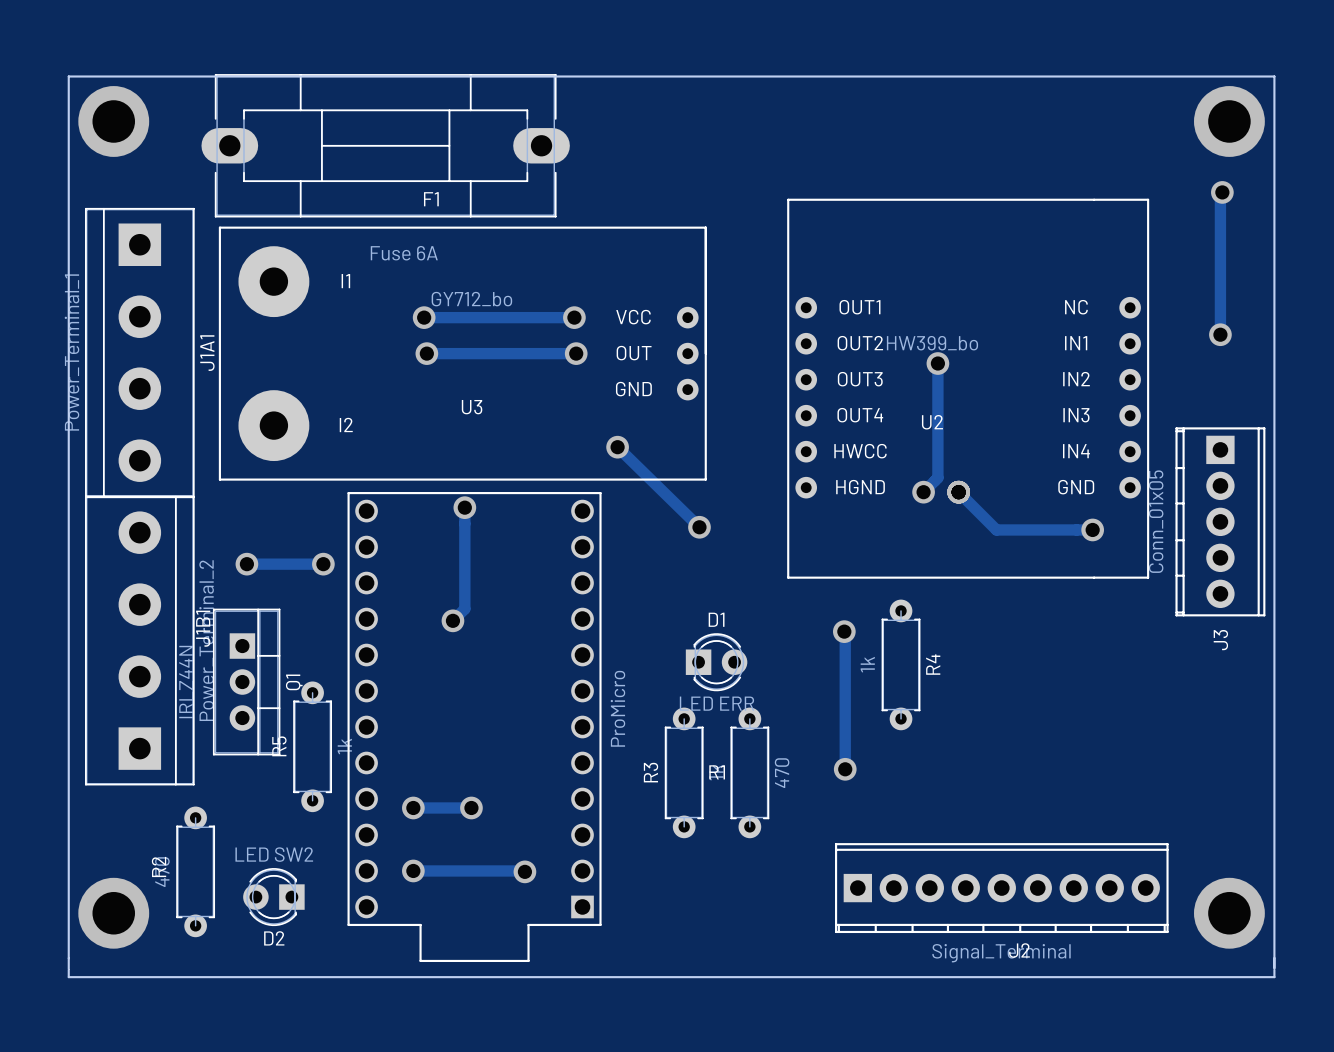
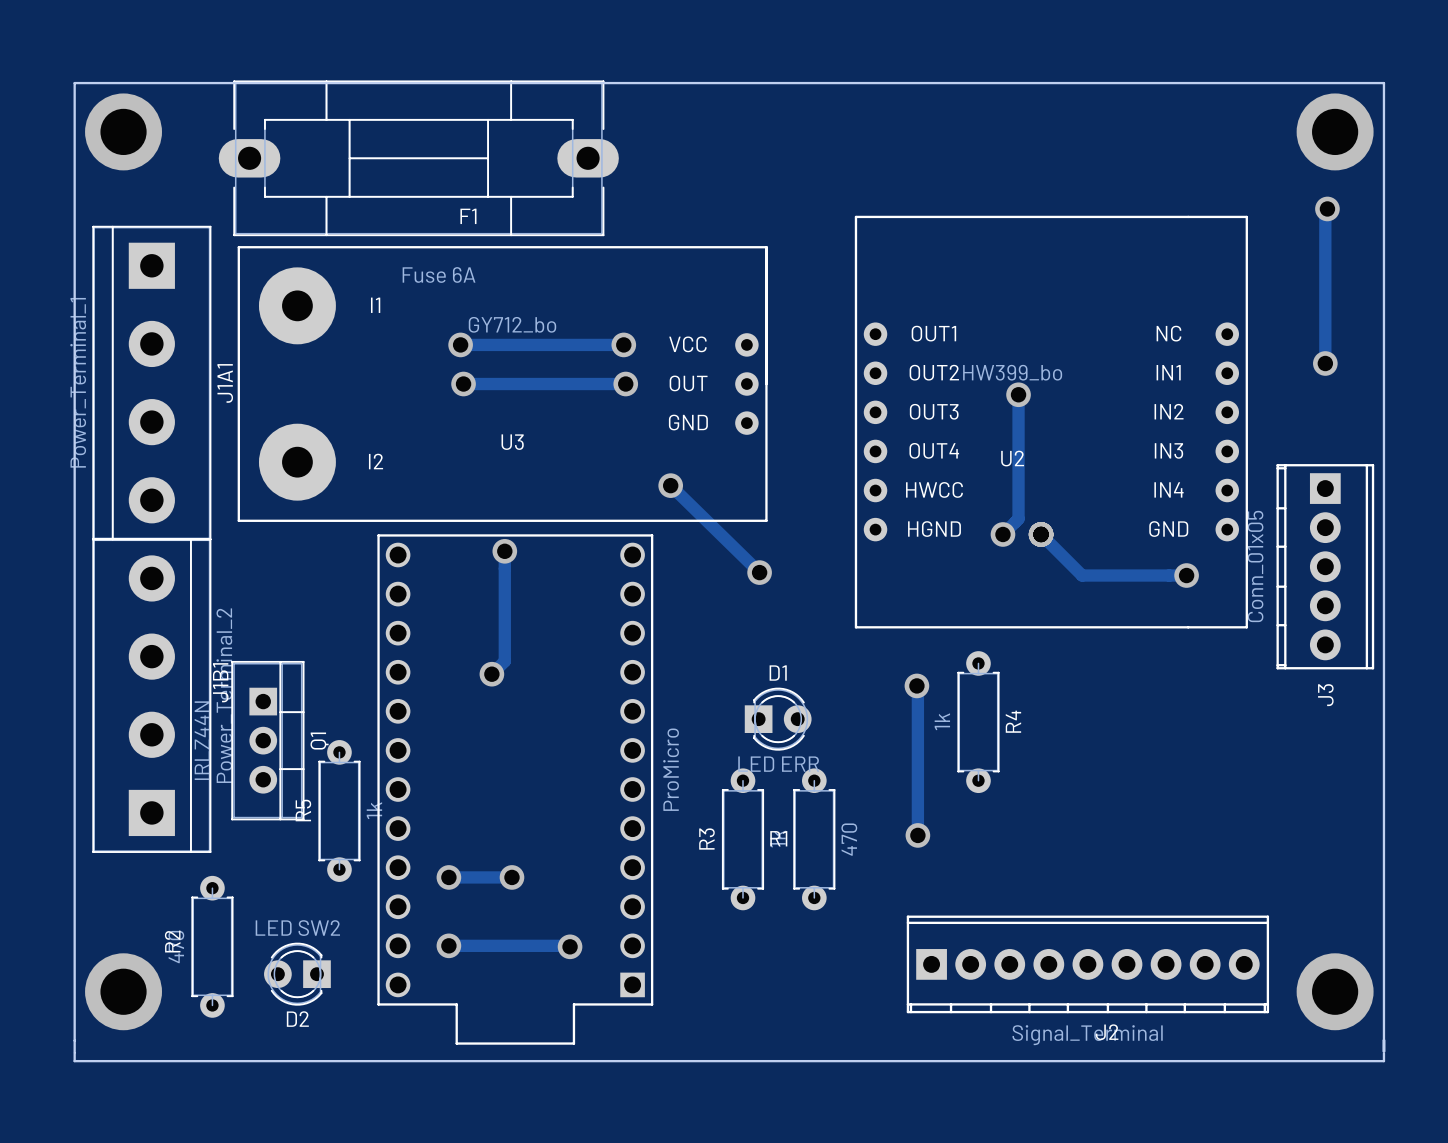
track: (246, 564) (323, 564) -> none
via: (246, 564) -> none
via: (323, 564) -> none

